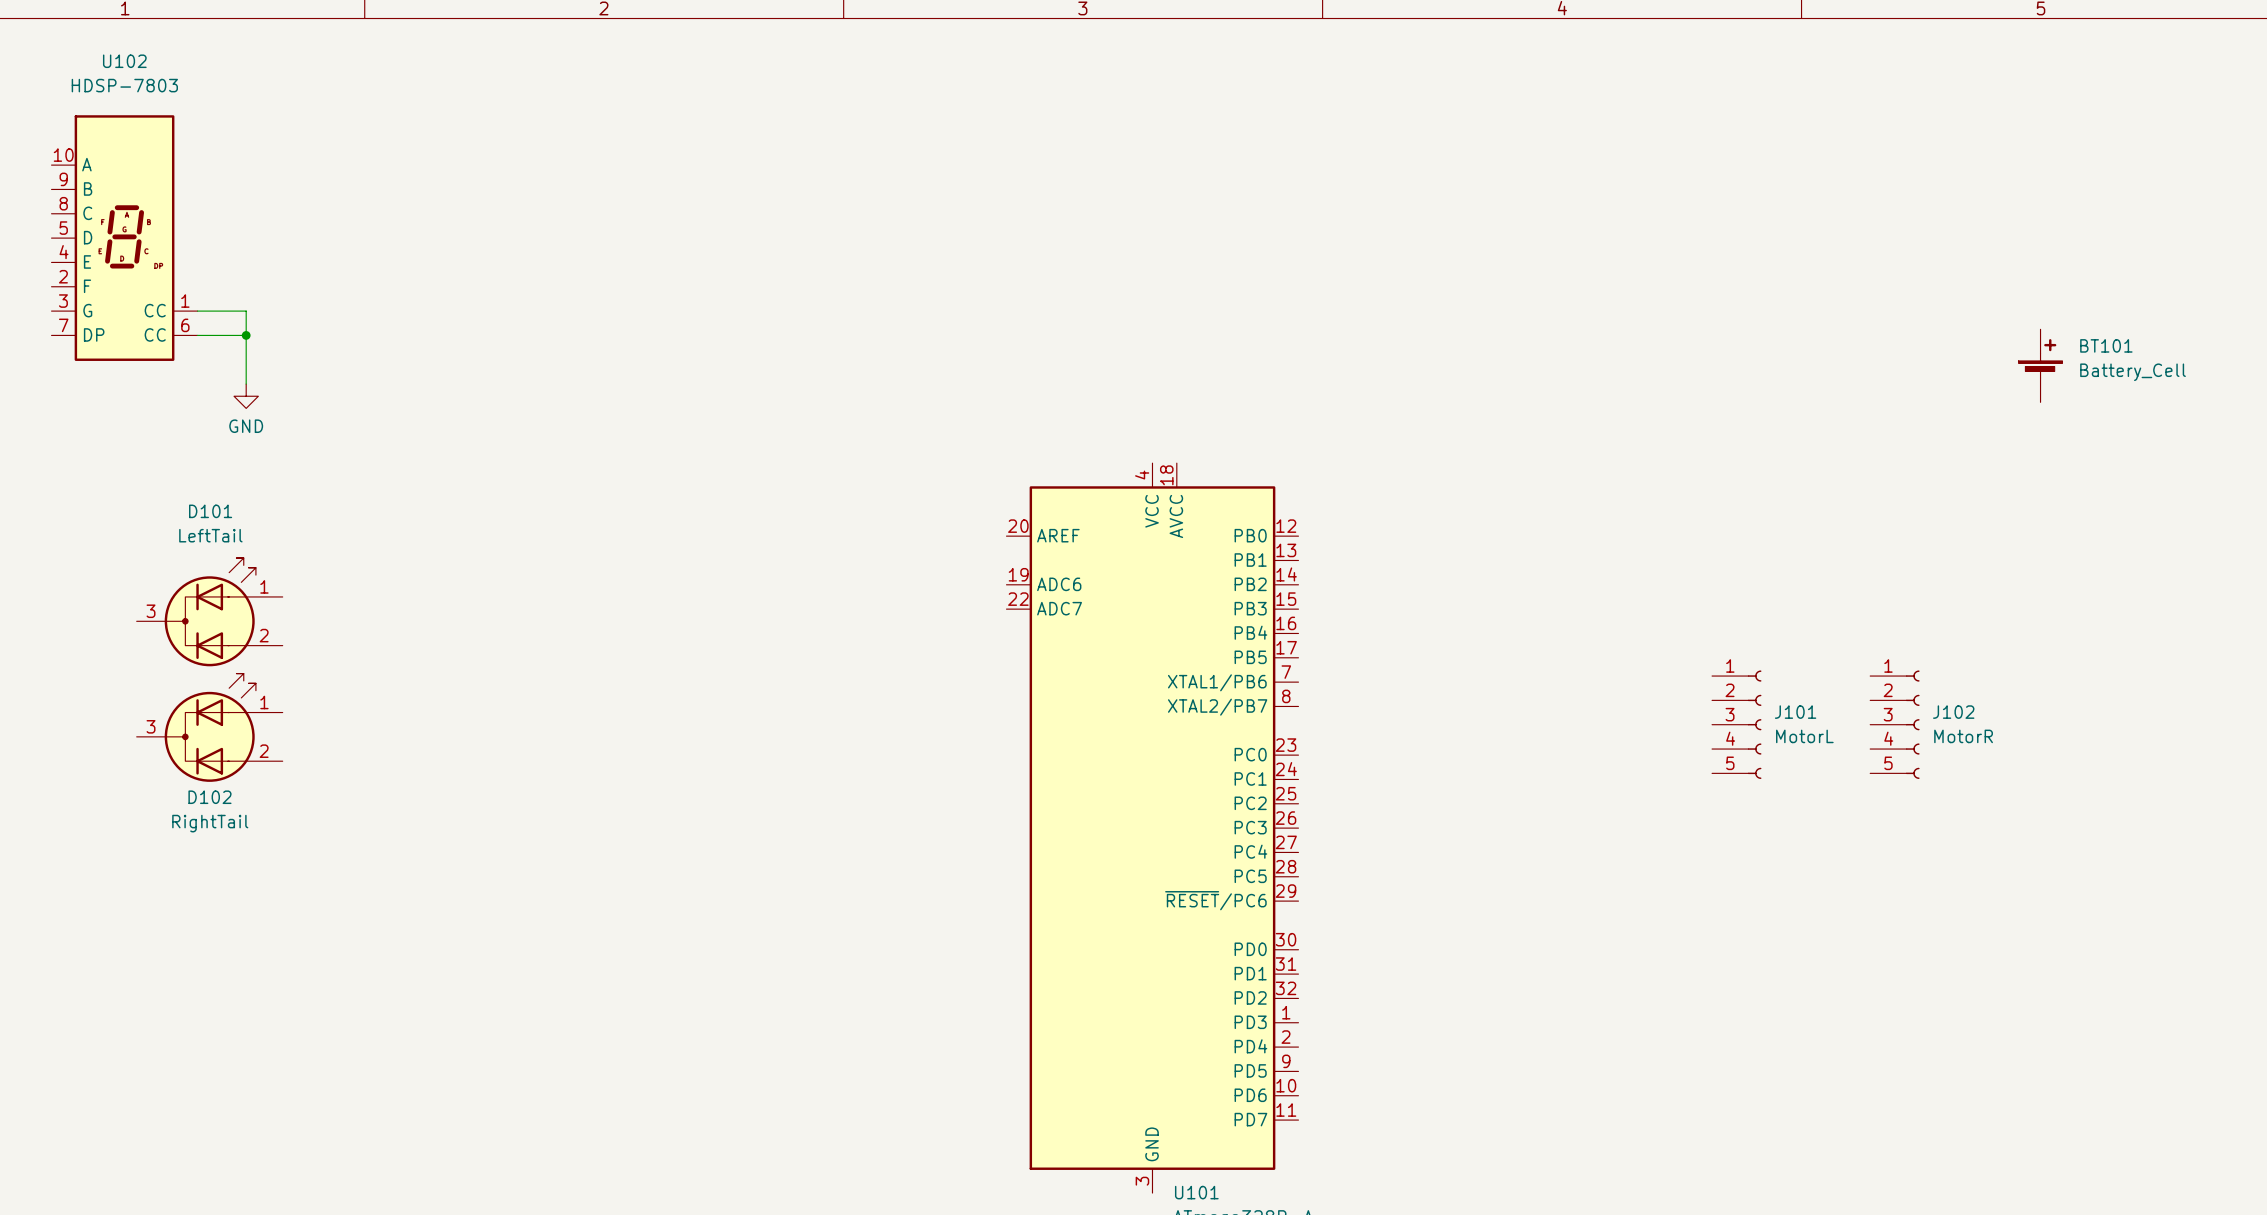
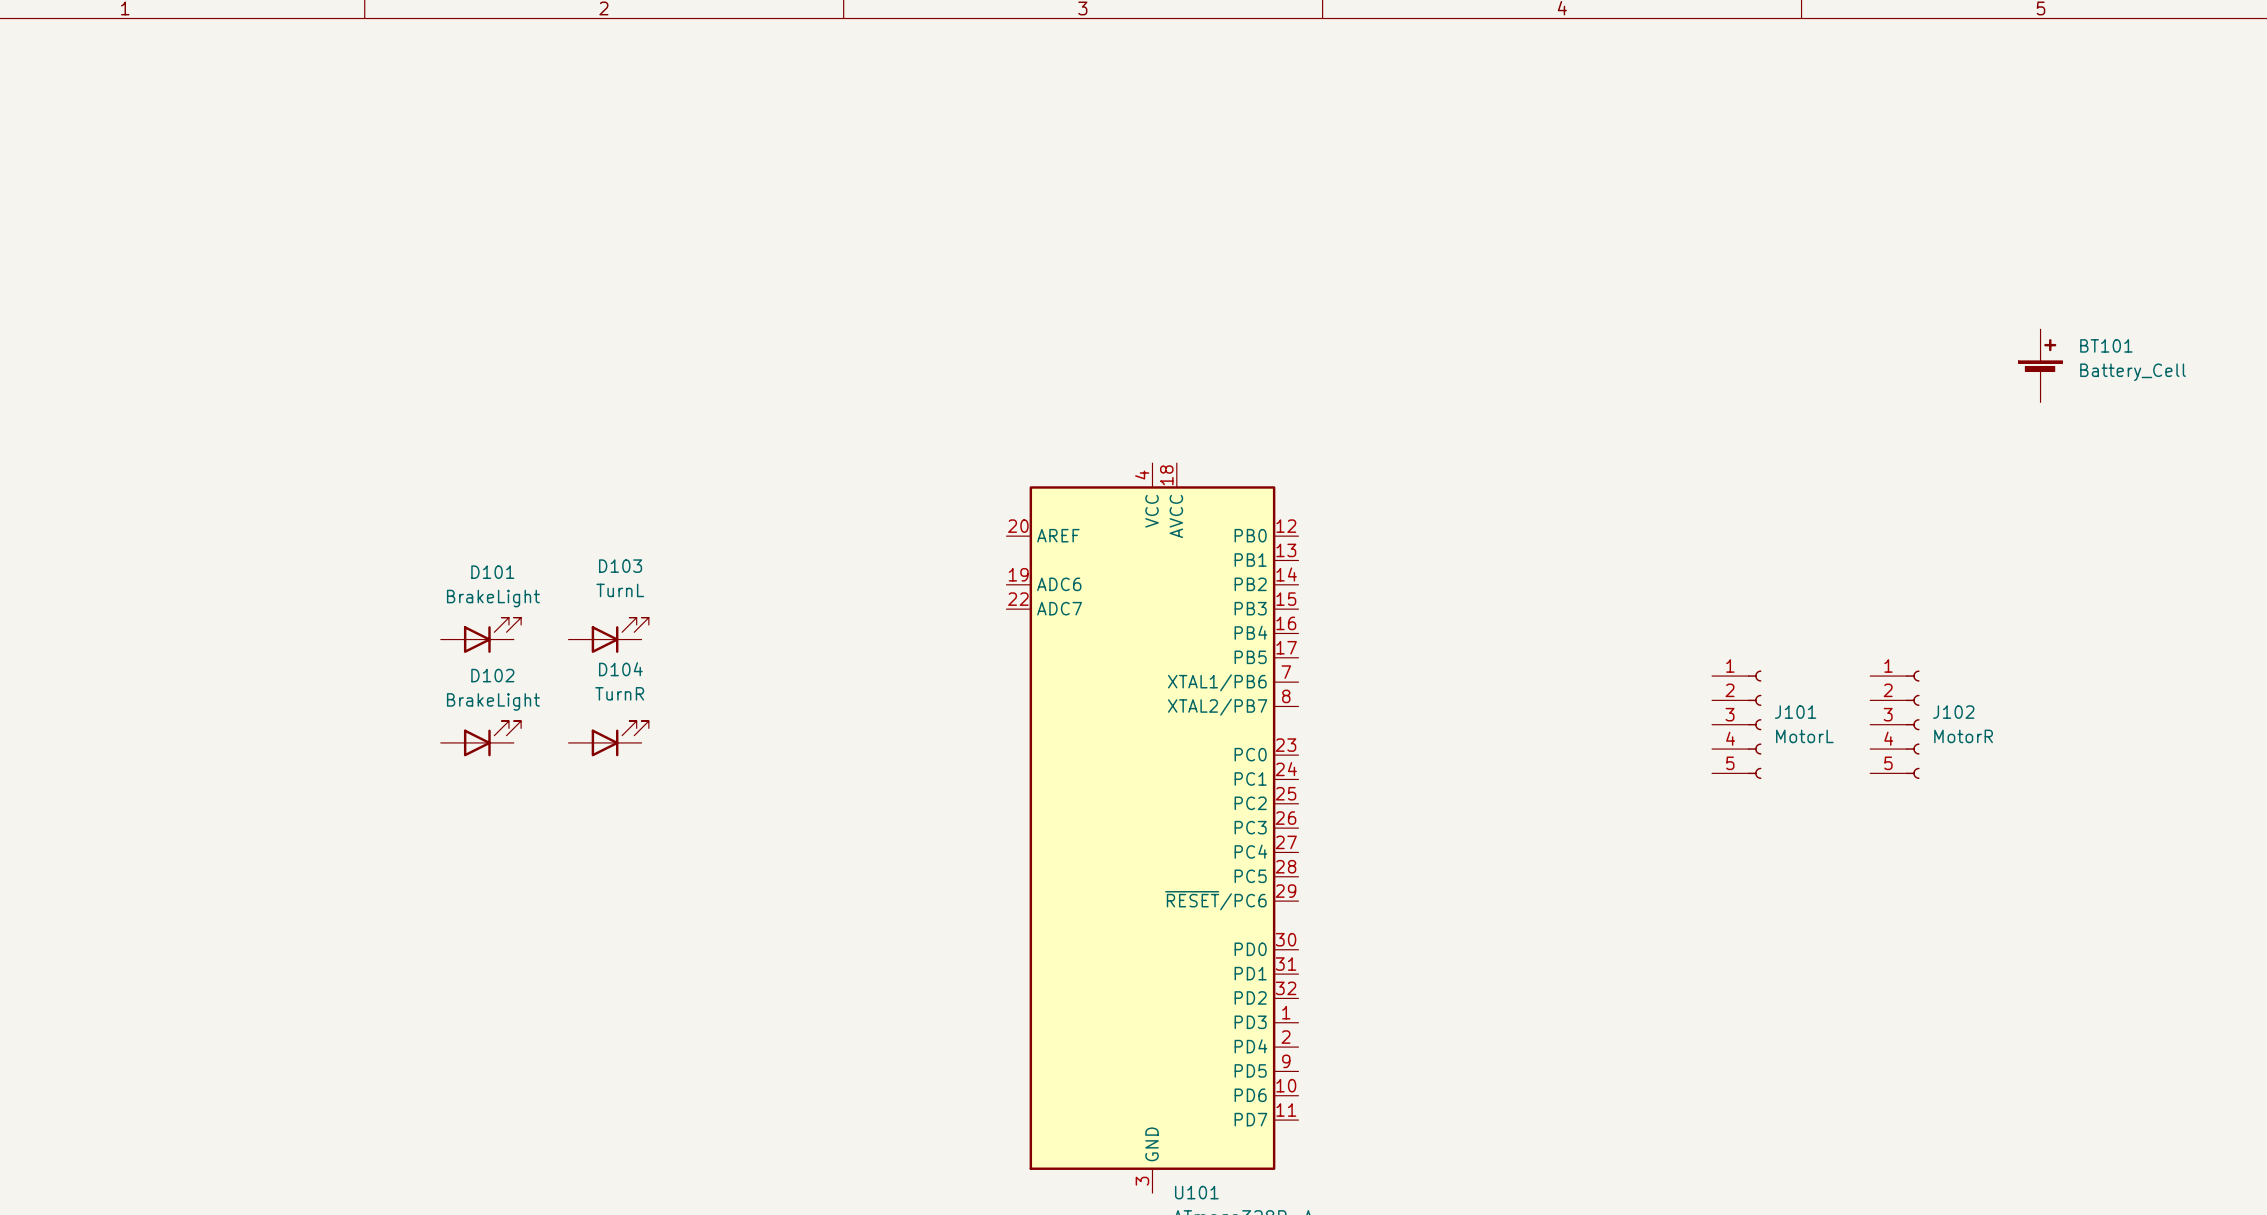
U102: HDSP-7803 (124, 238) -> none
wire: (197, 311) (246, 311) (246, 384) -> none
wire: (197, 335) (246, 335) -> none
junction: (246, 335) -> none
power symbol: GND (246, 396) -> none
D101 name position: D101 (210, 511) -> D101 (492, 572)
D101 value: LeftTail (210, 535) -> BrakeLight (493, 598)
D101 symbol: [136, 558, 283, 667] -> [440, 617, 522, 653]
D103: none -> TurnL (608, 635)
D102 symbol: [136, 673, 283, 782] -> [440, 721, 522, 757]
D104: none -> TurnR (608, 738)
D102 name position: D102 (209, 797) -> D102 (492, 675)
D102 value: RightTail (210, 823) -> BrakeLight (493, 701)

